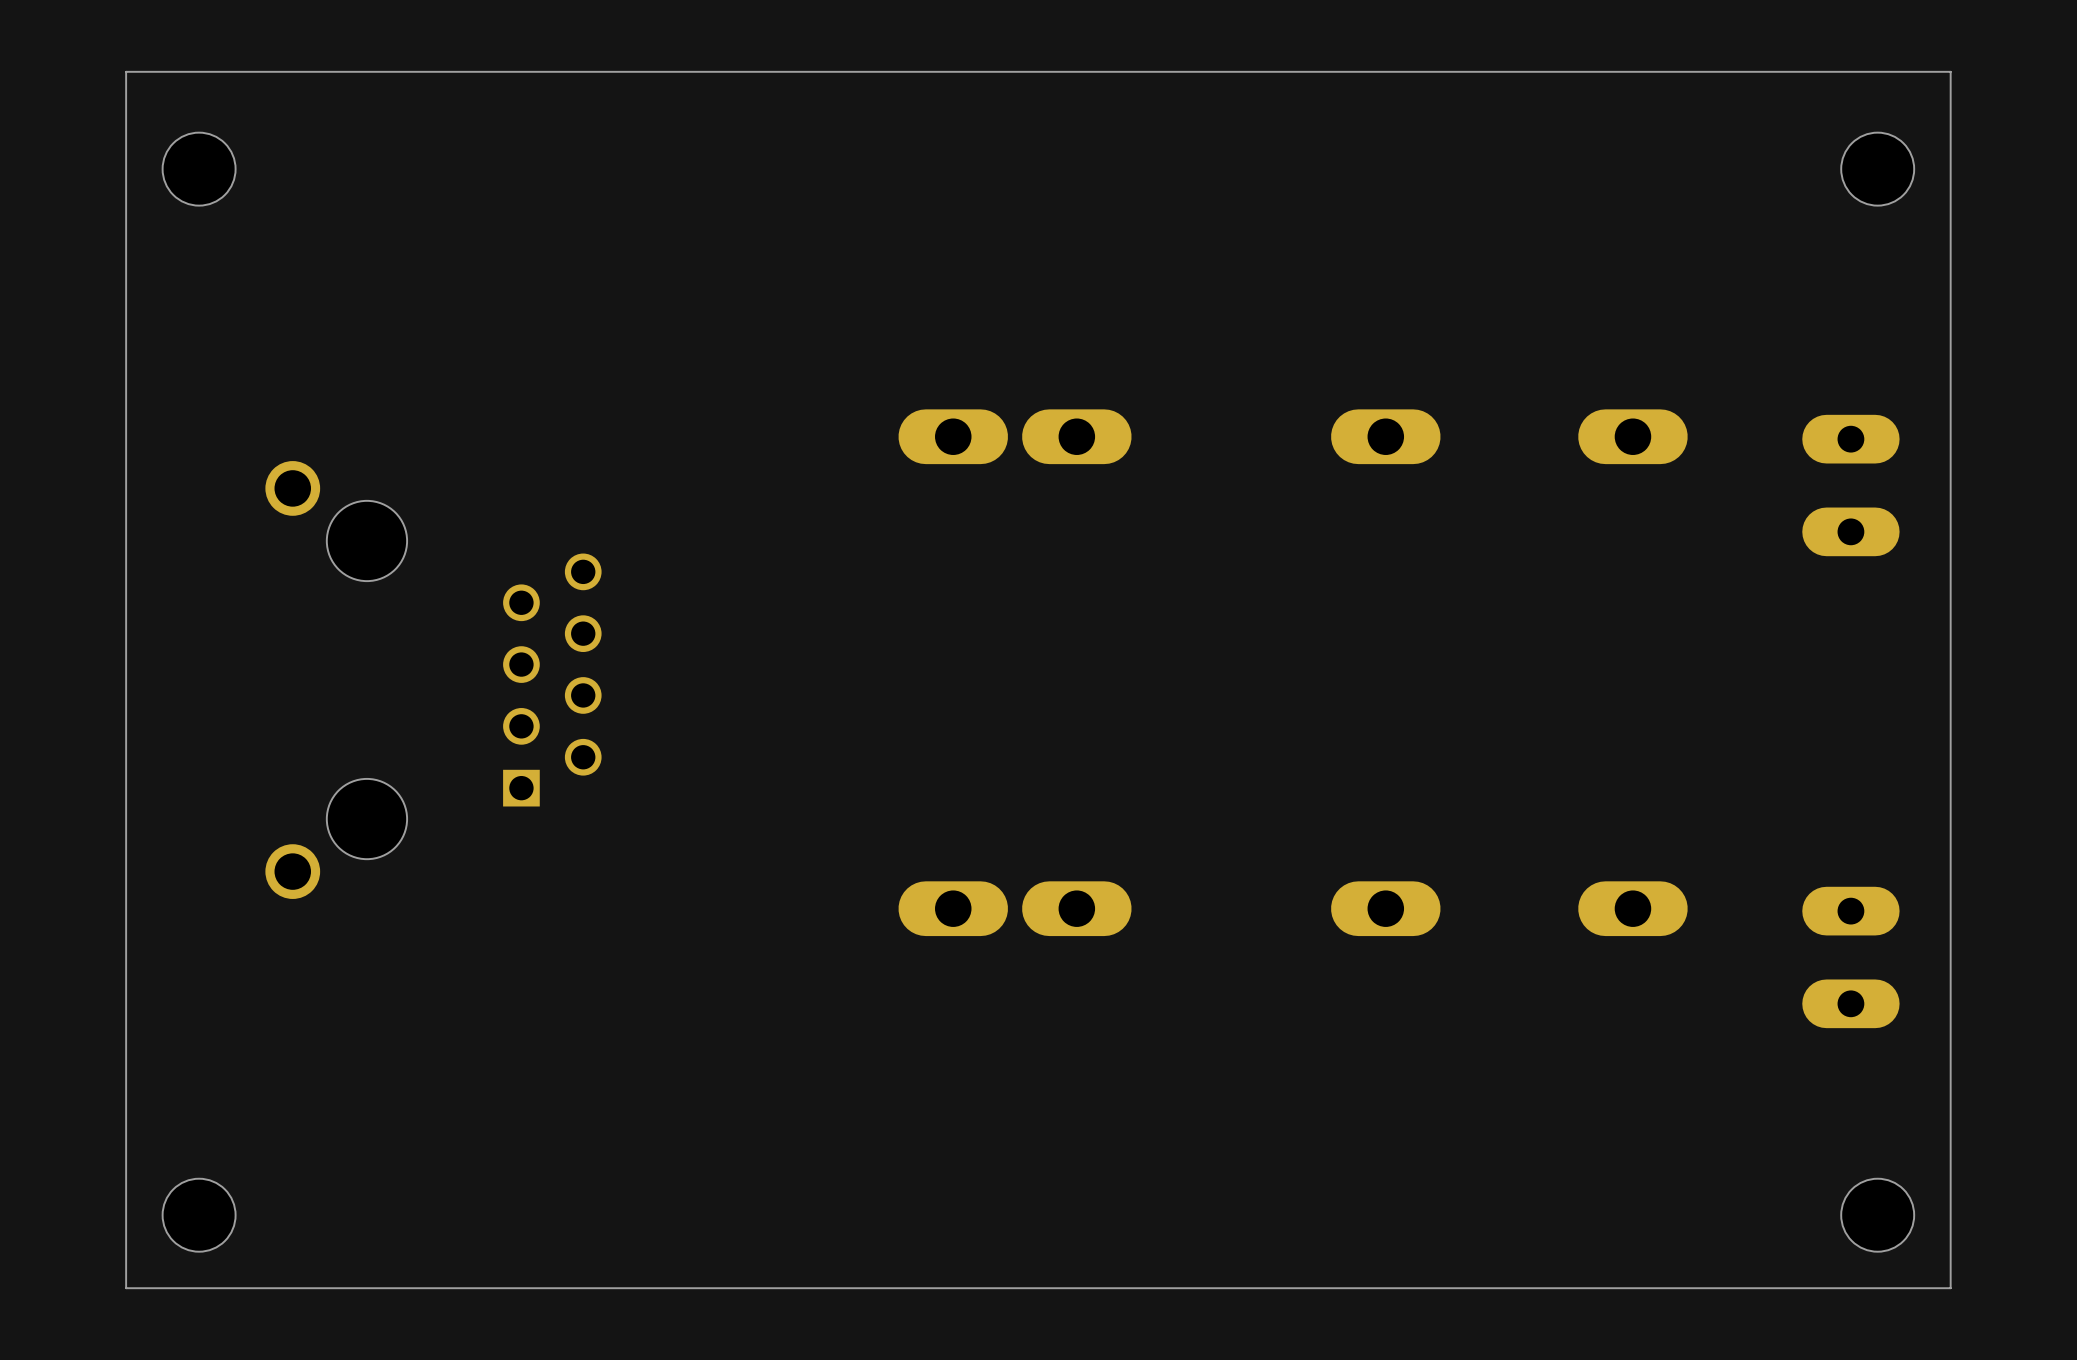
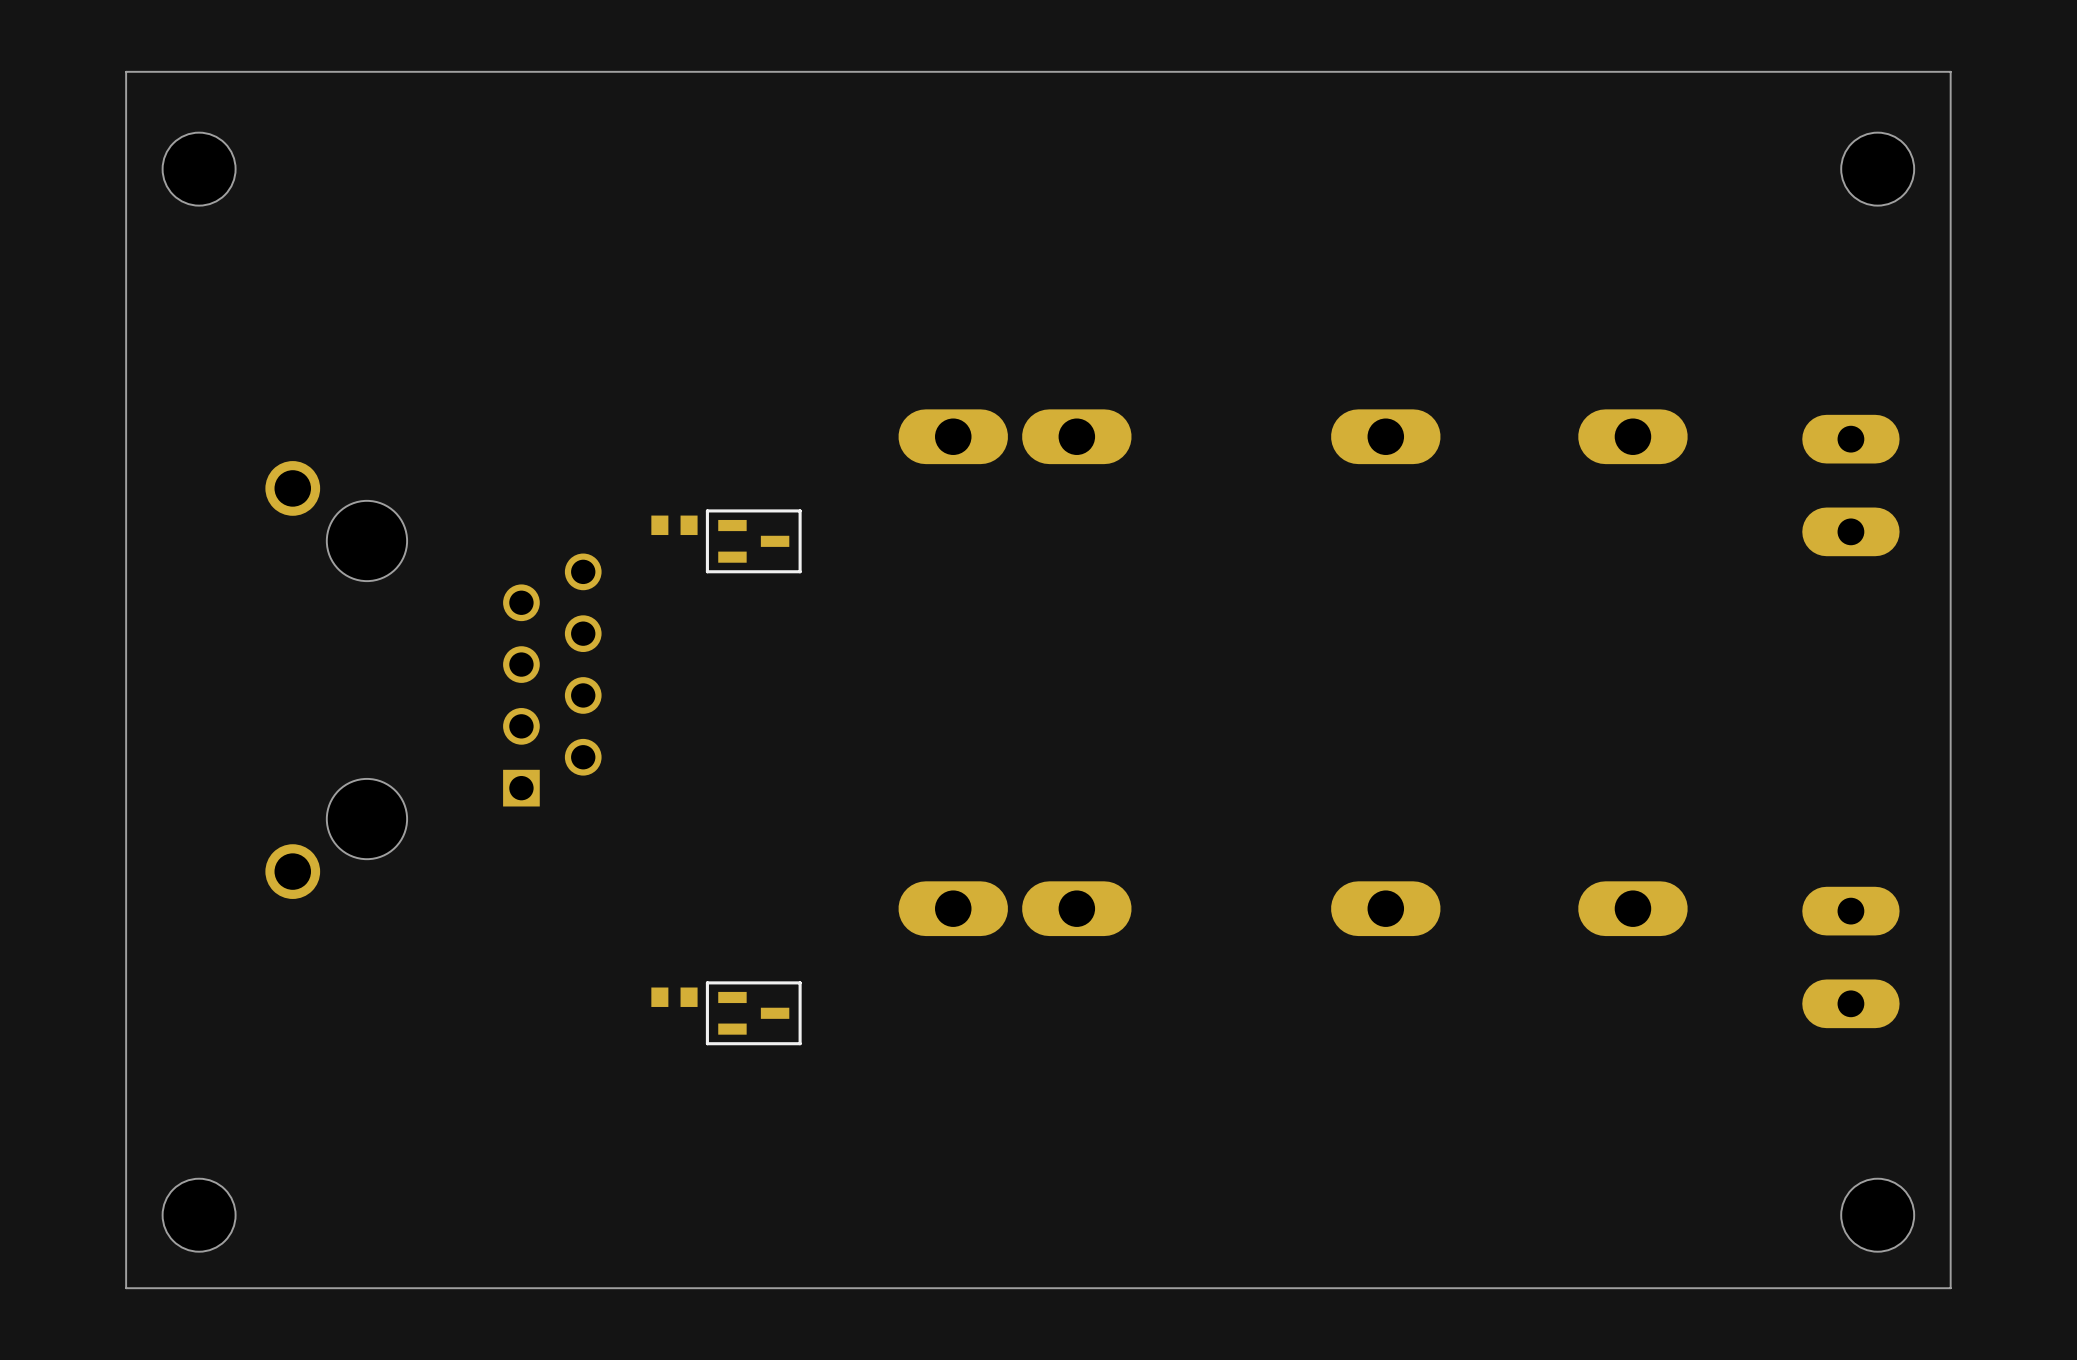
part: none -> (674, 525)
part: none -> (753, 541)
part: none -> (674, 997)
part: none -> (753, 1013)

